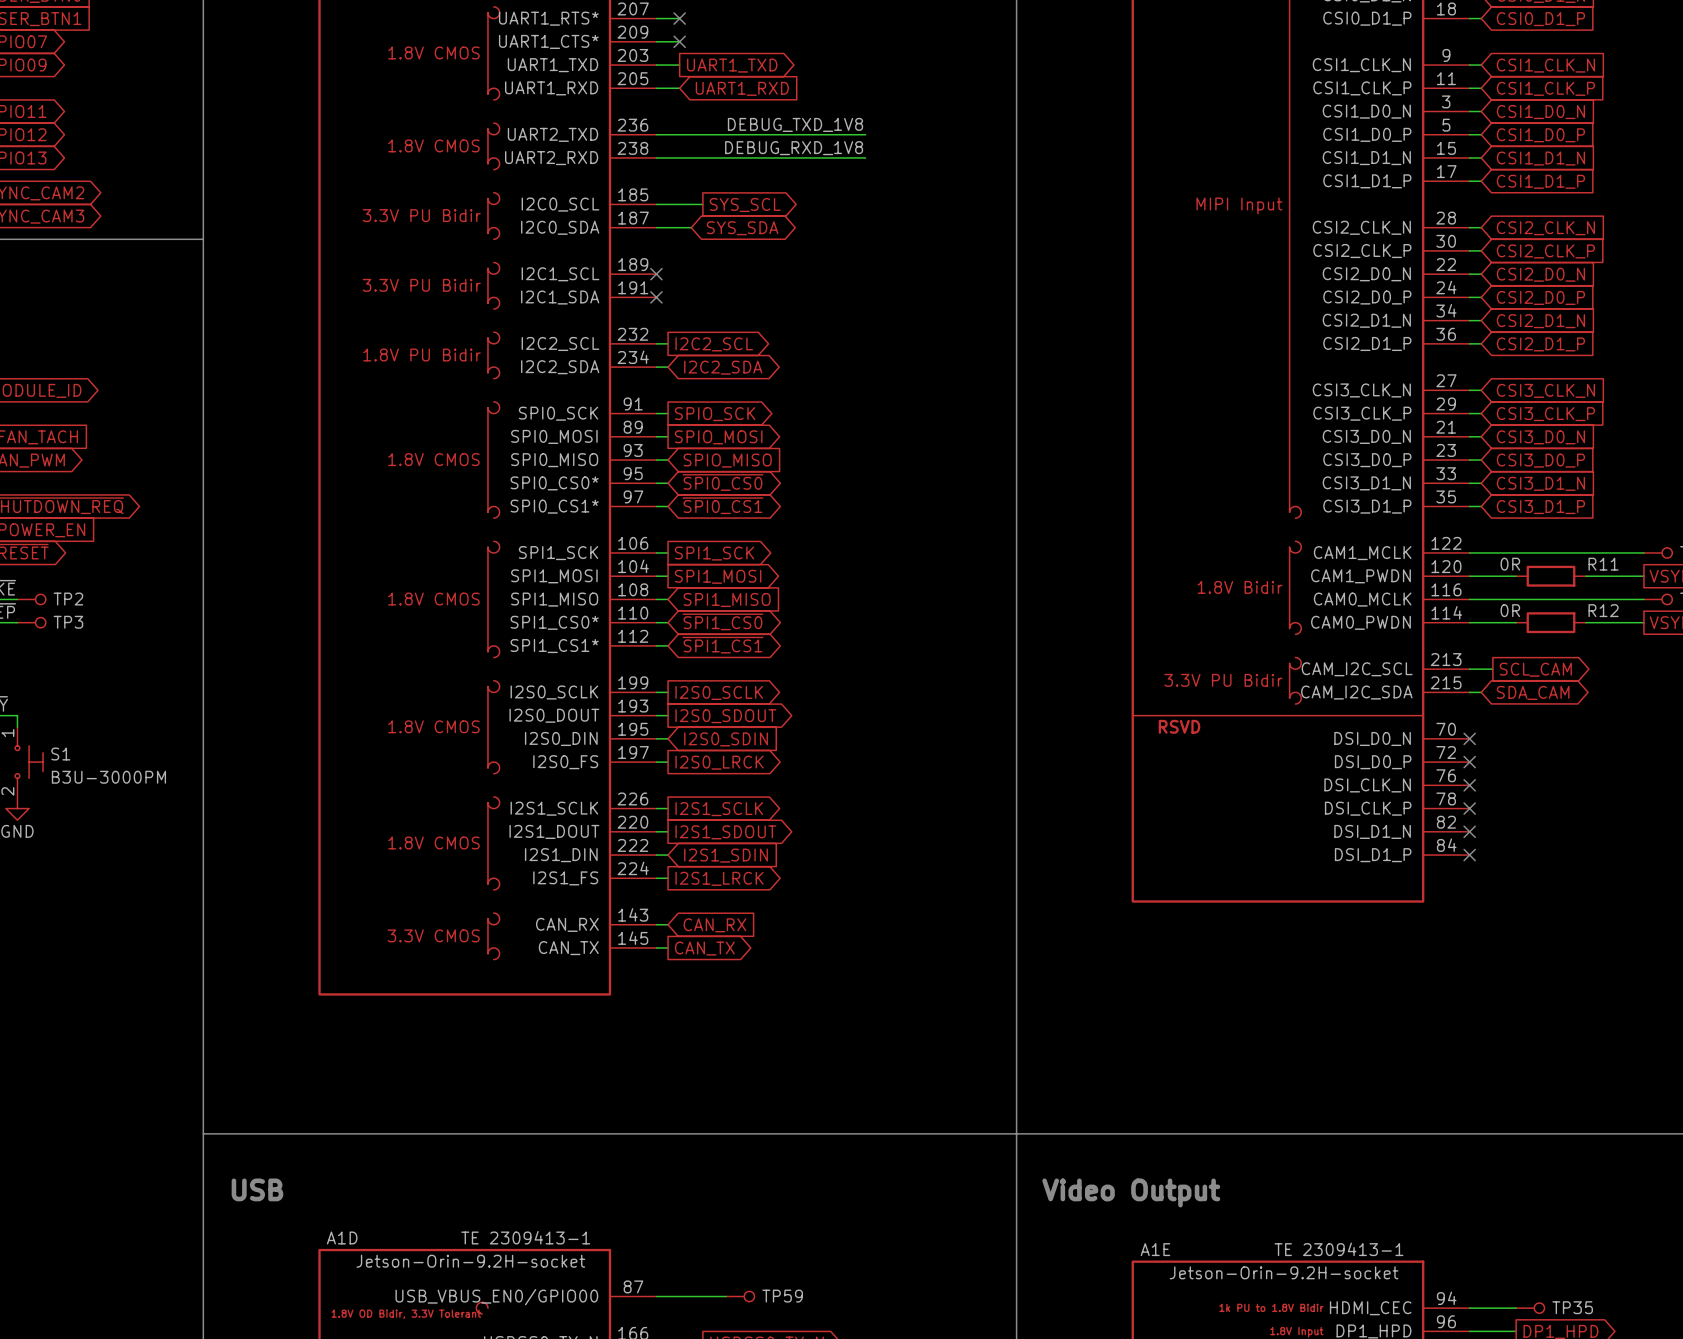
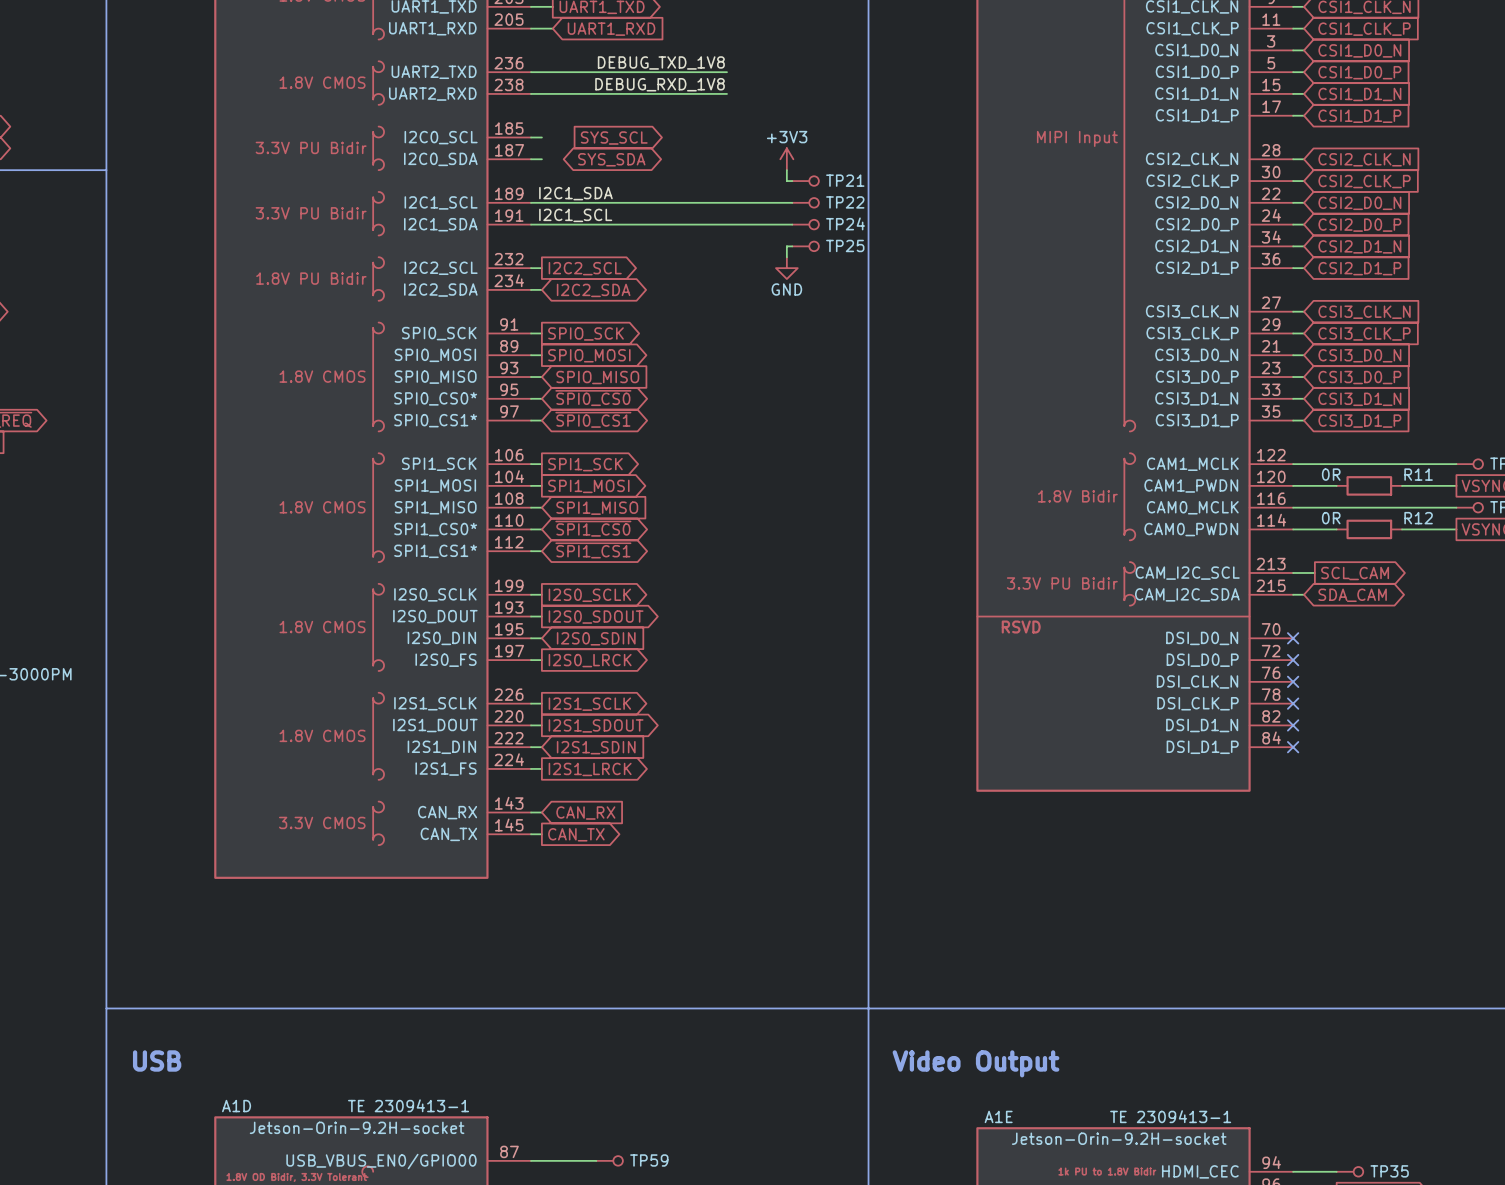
wire: (668, 204) (702, 204) -> none
wire: (668, 227) (691, 227) -> none
power symbol: none -> +3V3 (786, 159)
wire: none -> (786, 170) (786, 181) (792, 181)
TP21: none -> (805, 181)
label: none -> I2C1_SDA (575, 193)
wire: none -> (531, 202) (792, 202)
no-connect mark: (656, 274) -> none
TP22: none -> (805, 202)
label: none -> I2C1_SCL (575, 215)
wire: none -> (531, 224) (792, 224)
no-connect mark: (656, 297) -> none
TP24: none -> (805, 224)
wire: none -> (792, 246) (786, 246) (786, 257)
TP25: none -> (805, 246)
power symbol: none -> GND (786, 268)

